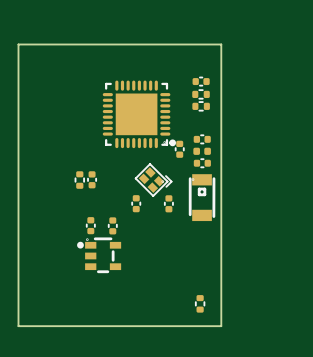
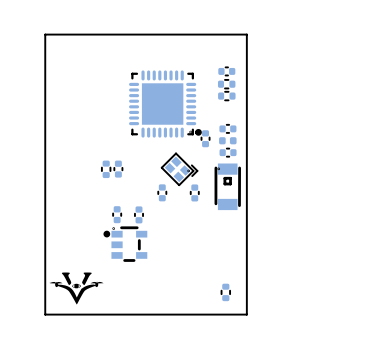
drawing: none -> [49, 272, 104, 305]

